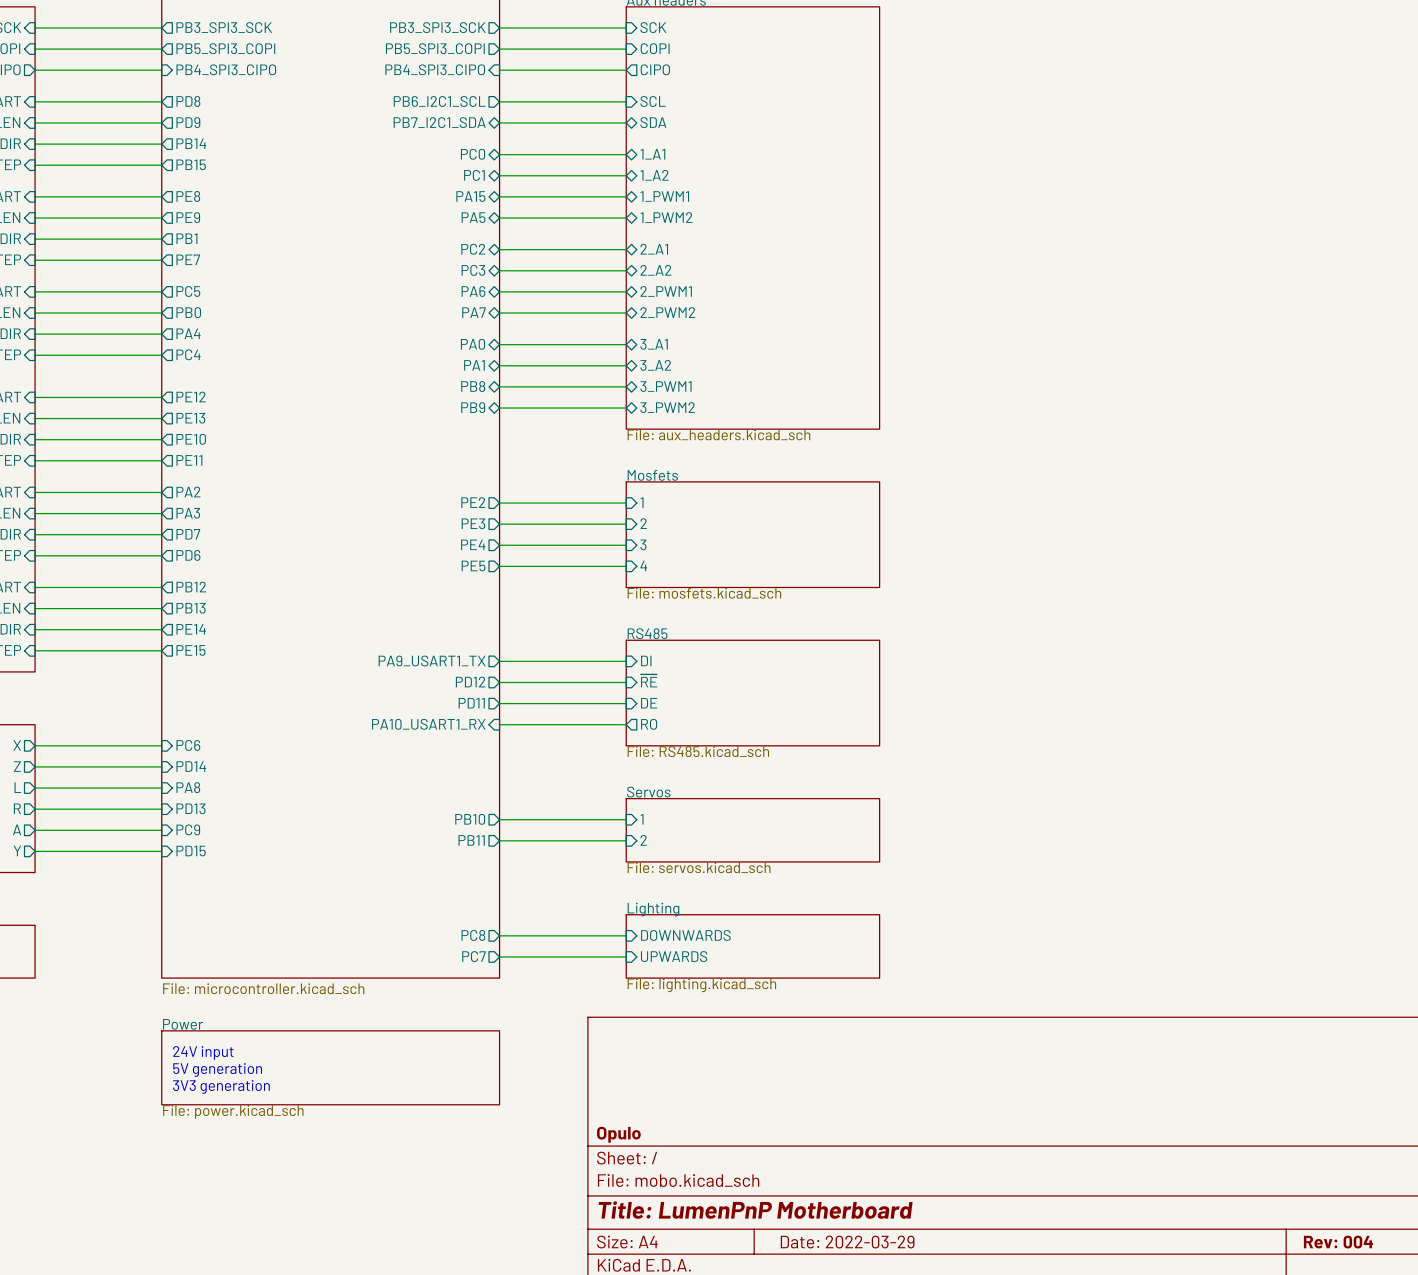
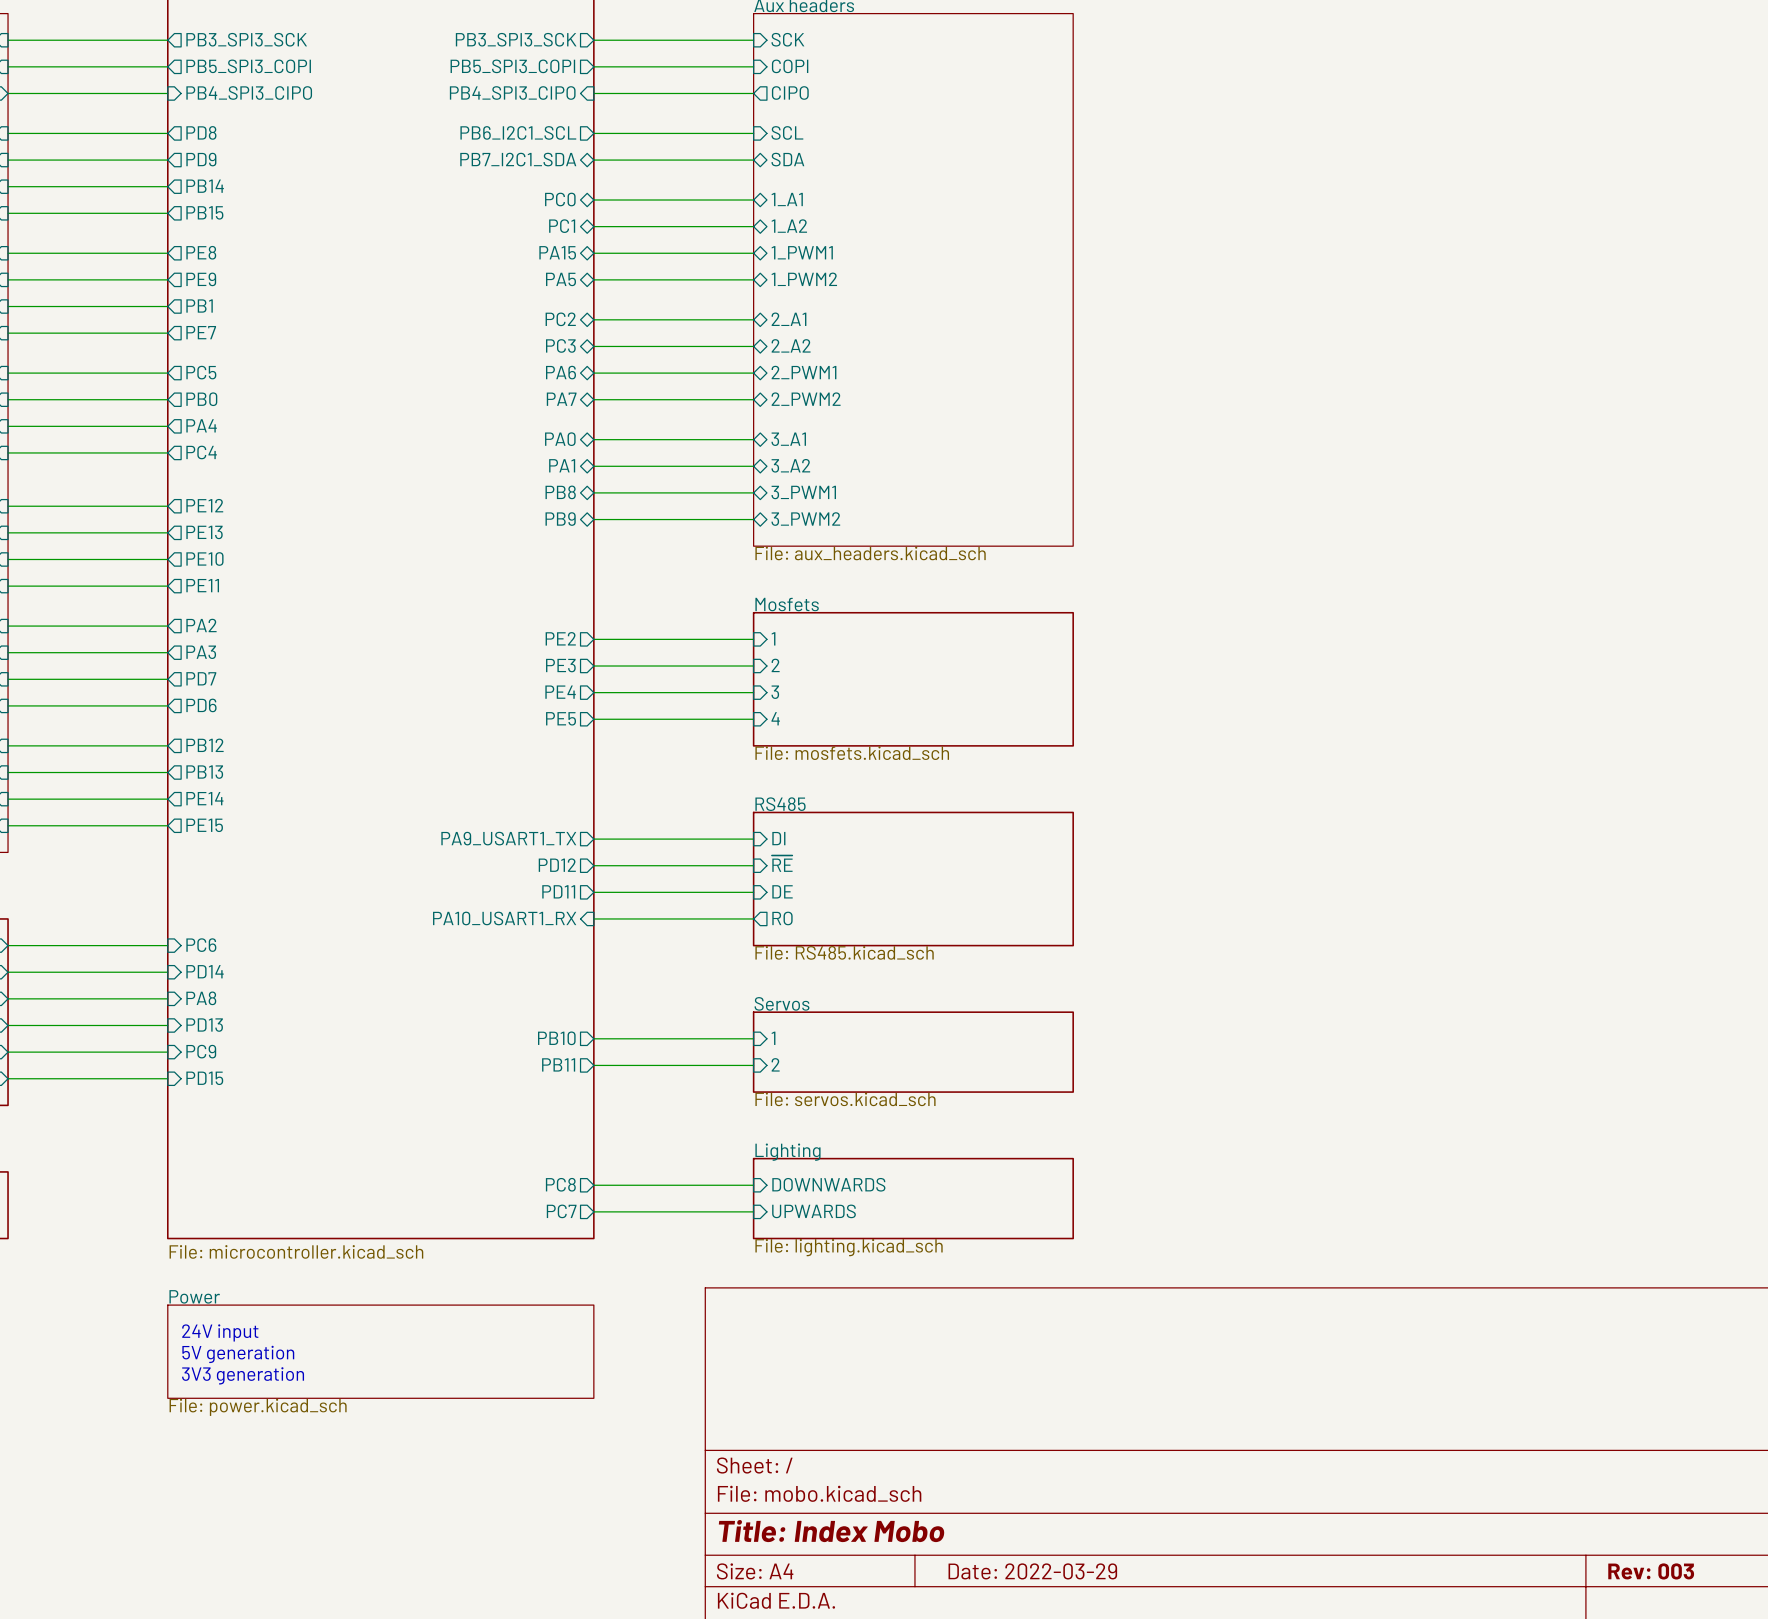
title block: Opulo (618, 1134) -> none
title block: Title: LumenPnP Motherboard (755, 1210) -> Title: Index Mobo (831, 1531)
title block: Rev: 004 (1338, 1242) -> Rev: 003 (1651, 1571)

